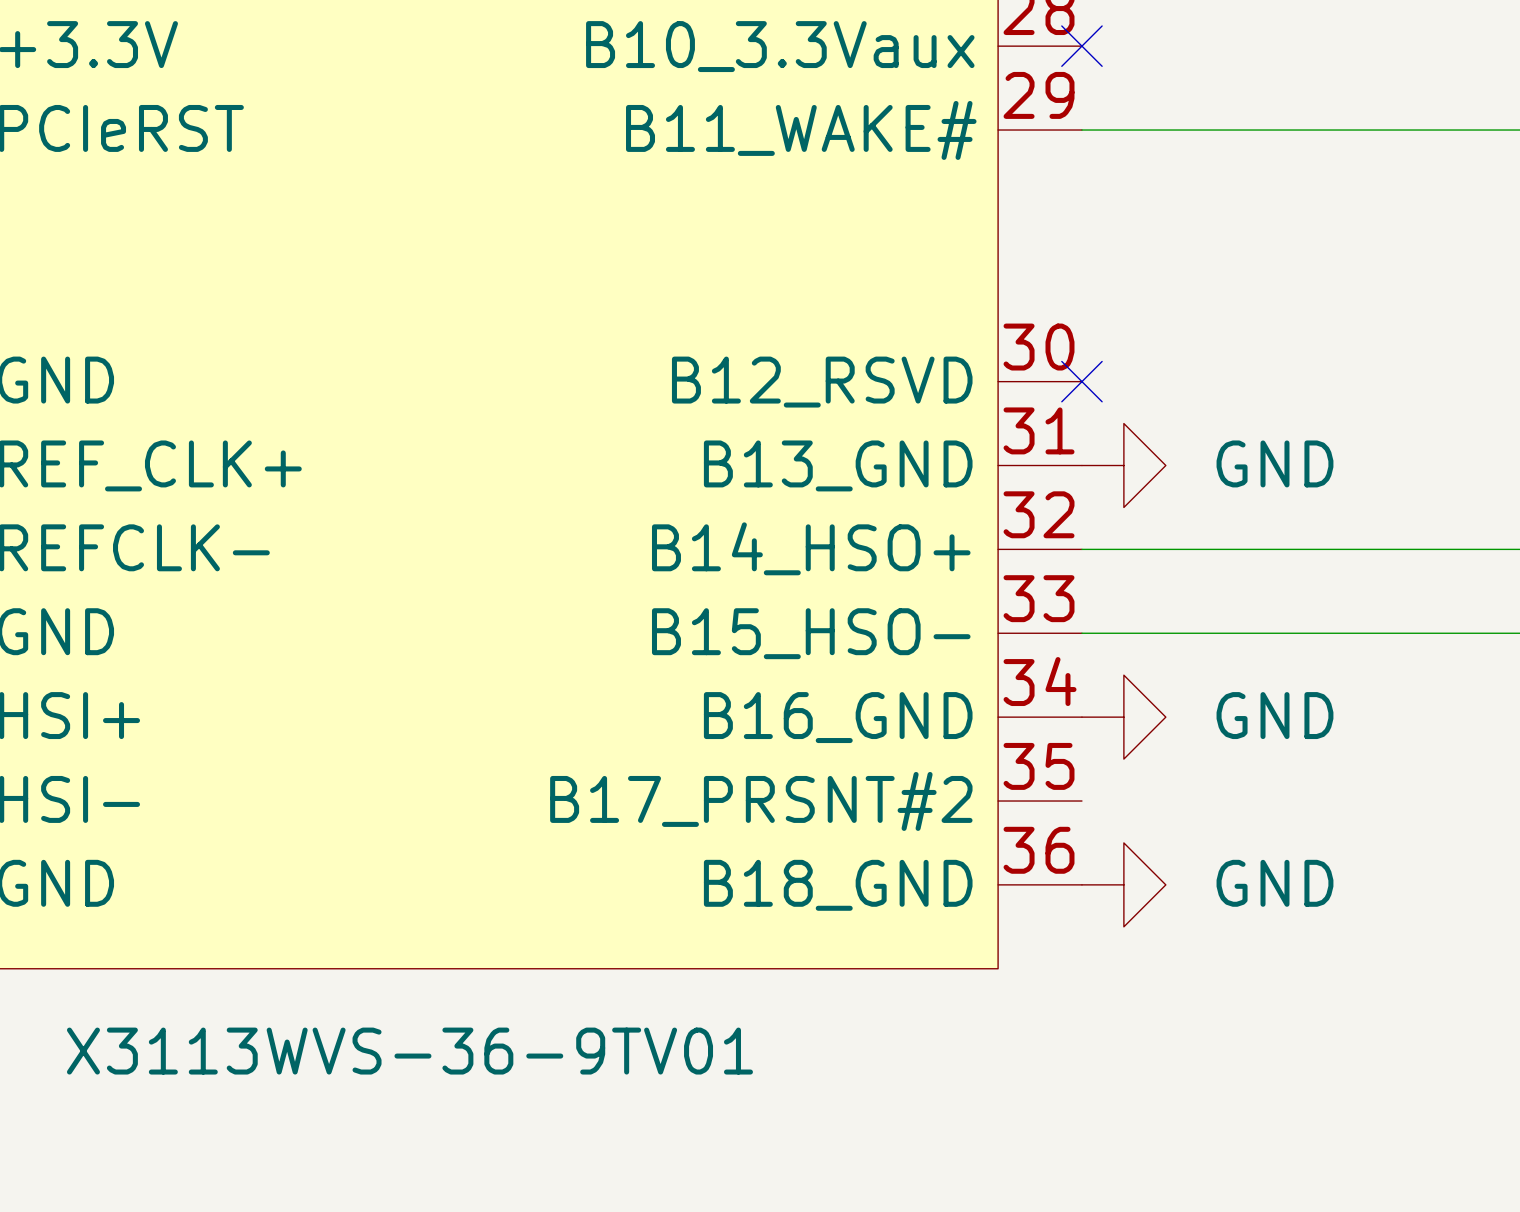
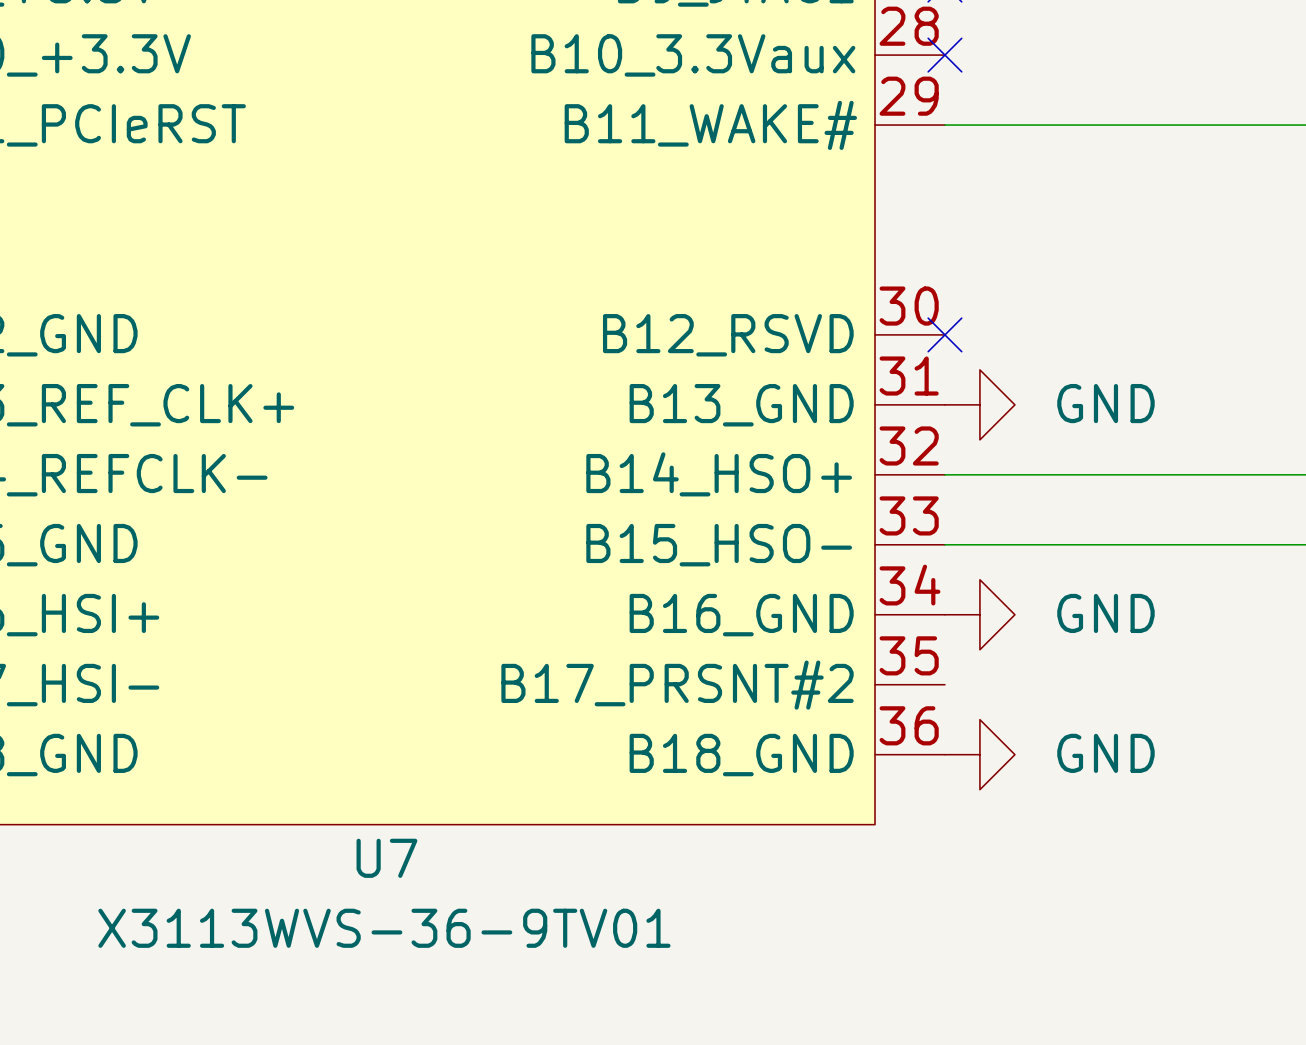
U7 name: none -> U7 (386, 858)
U7 value position: X3113WVS-36-9TV01 (409, 1051) -> X3113WVS-36-9TV01 (384, 928)

